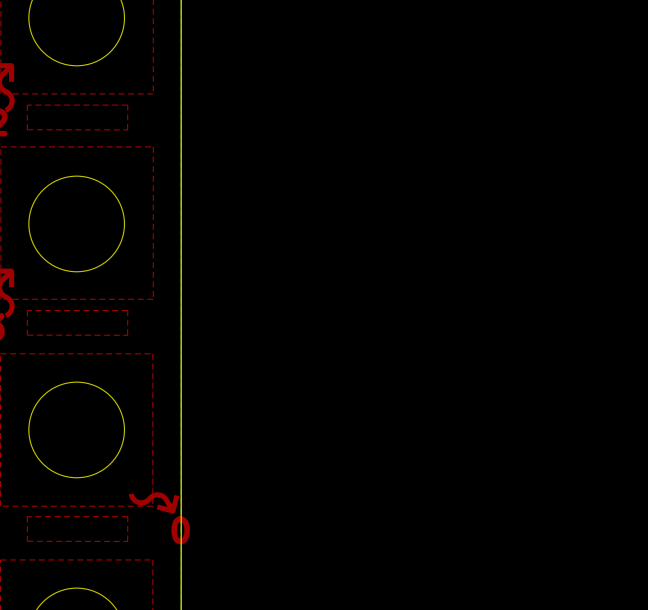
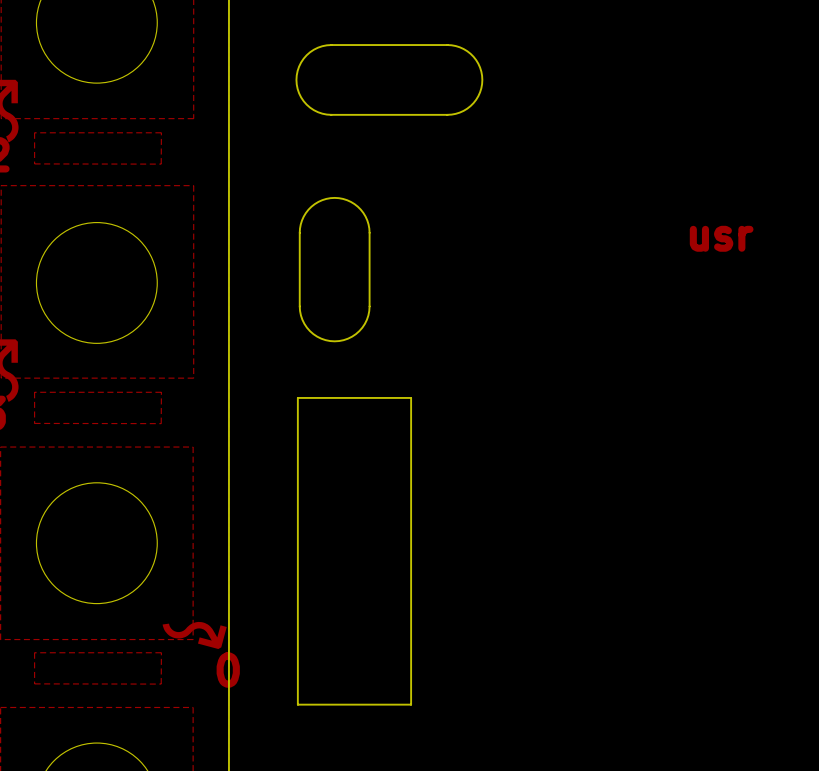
board edge: none -> (331, 45) (455, 46) (467, 51) (476, 60) (482, 75) (481, 88) (476, 99) (470, 106) (463, 110) (451, 114) (322, 113) (310, 107) (303, 101) (297, 88) (296, 75) (301, 62) (310, 52) (322, 46) (331, 45)
board edge: none -> (299, 232) (299, 306) (302, 319) (309, 331) (321, 338) (334, 341) (348, 338) (362, 327) (369, 310) (369, 232) (365, 216) (360, 209) (350, 201) (338, 198) (326, 198) (314, 204) (308, 209) (302, 220) (299, 232)
text: none -> usr (721, 238)
board edge: none -> (297, 397) (411, 397) (411, 704) (297, 704) (297, 397)

